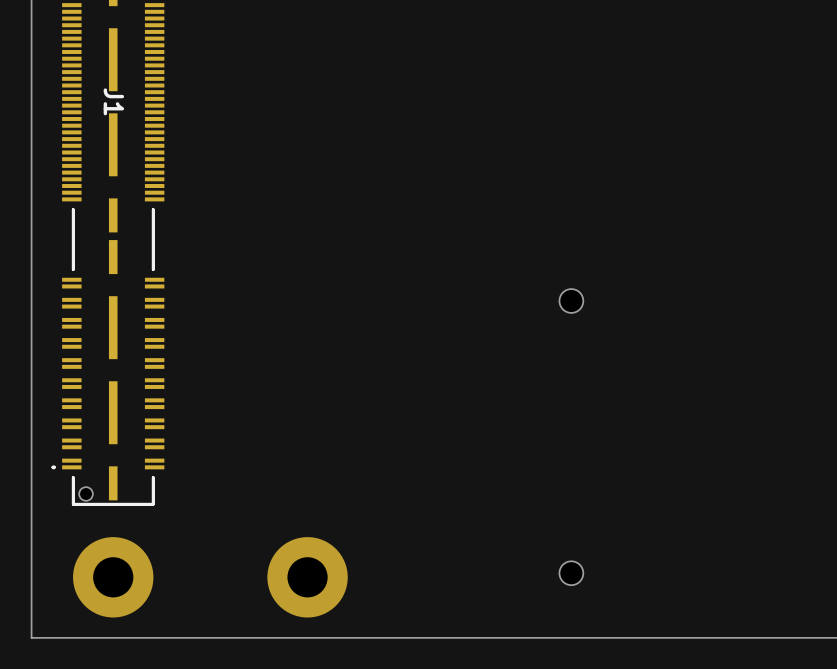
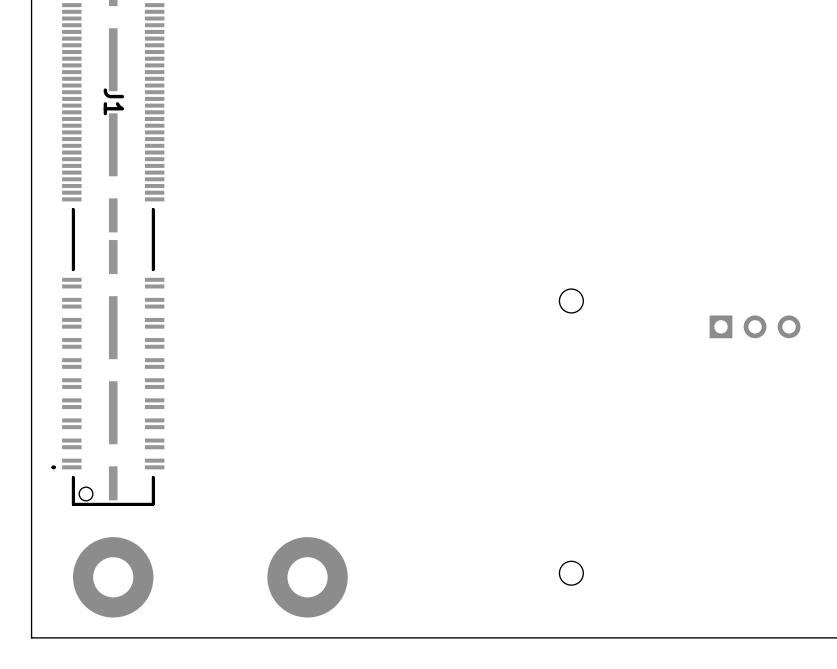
part: none -> (755, 326)

